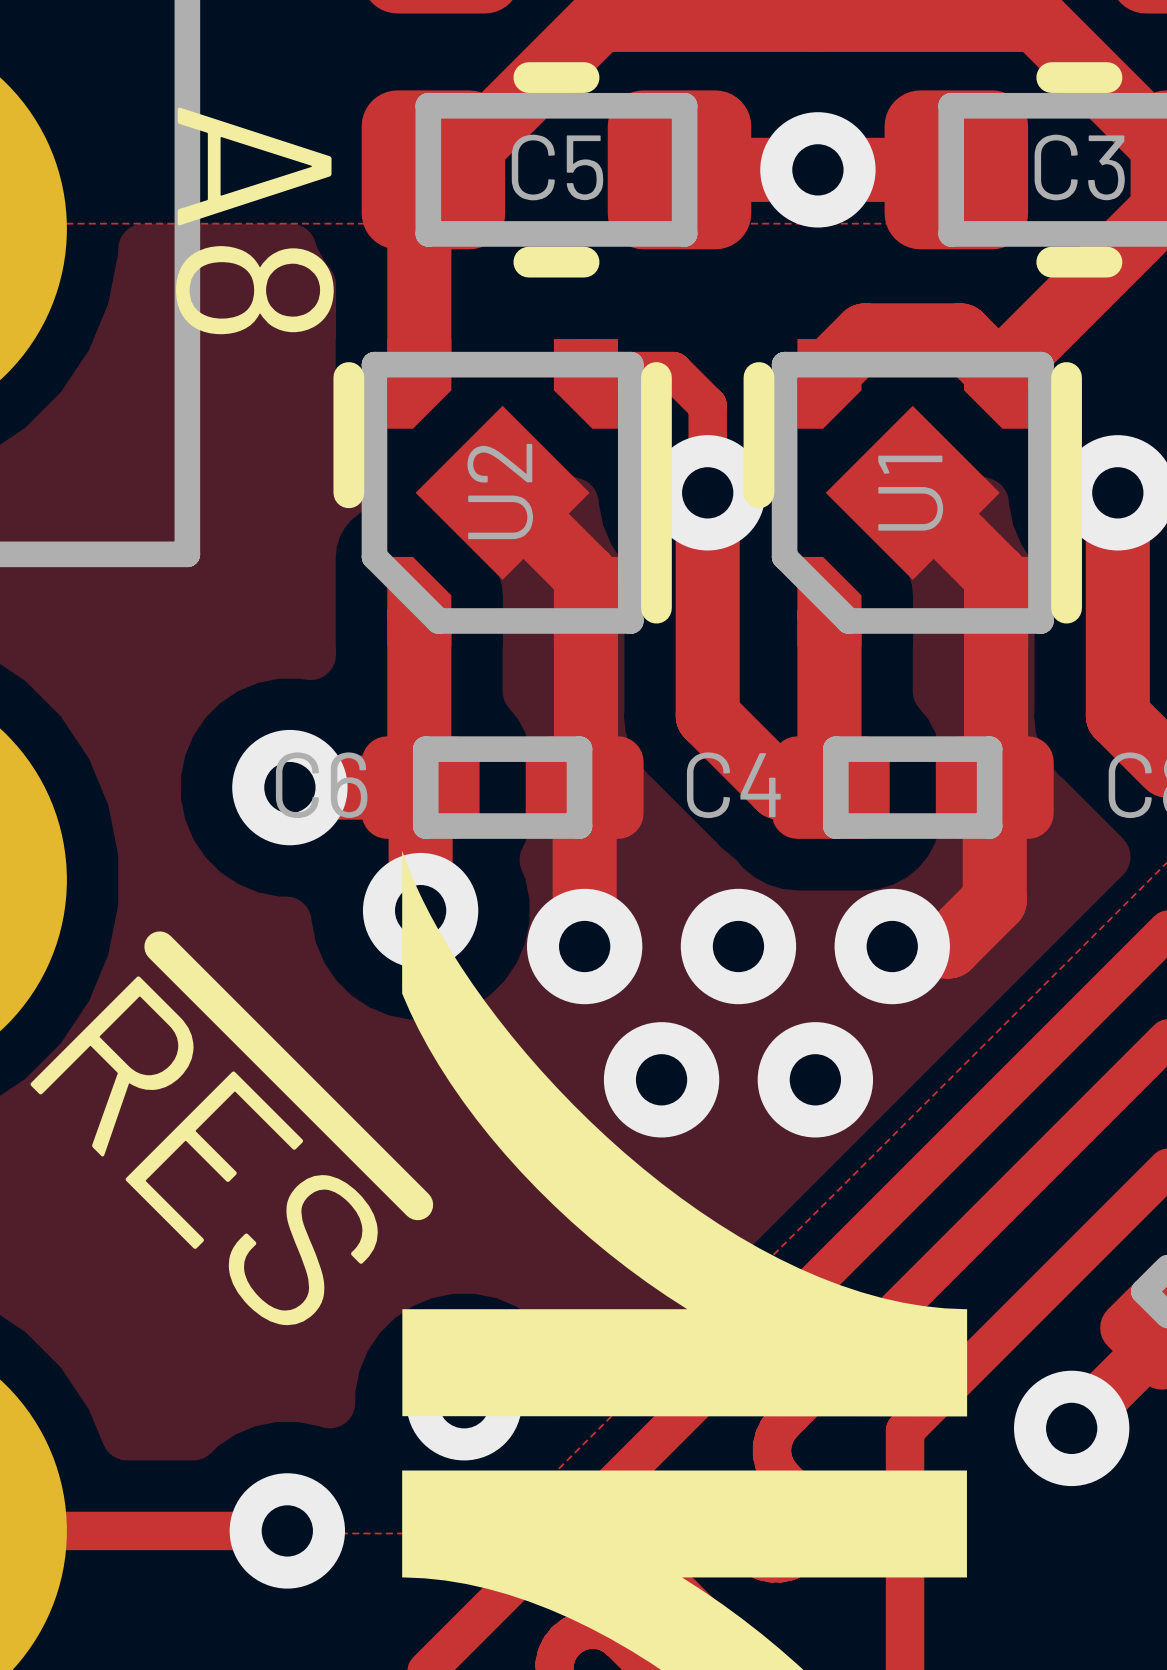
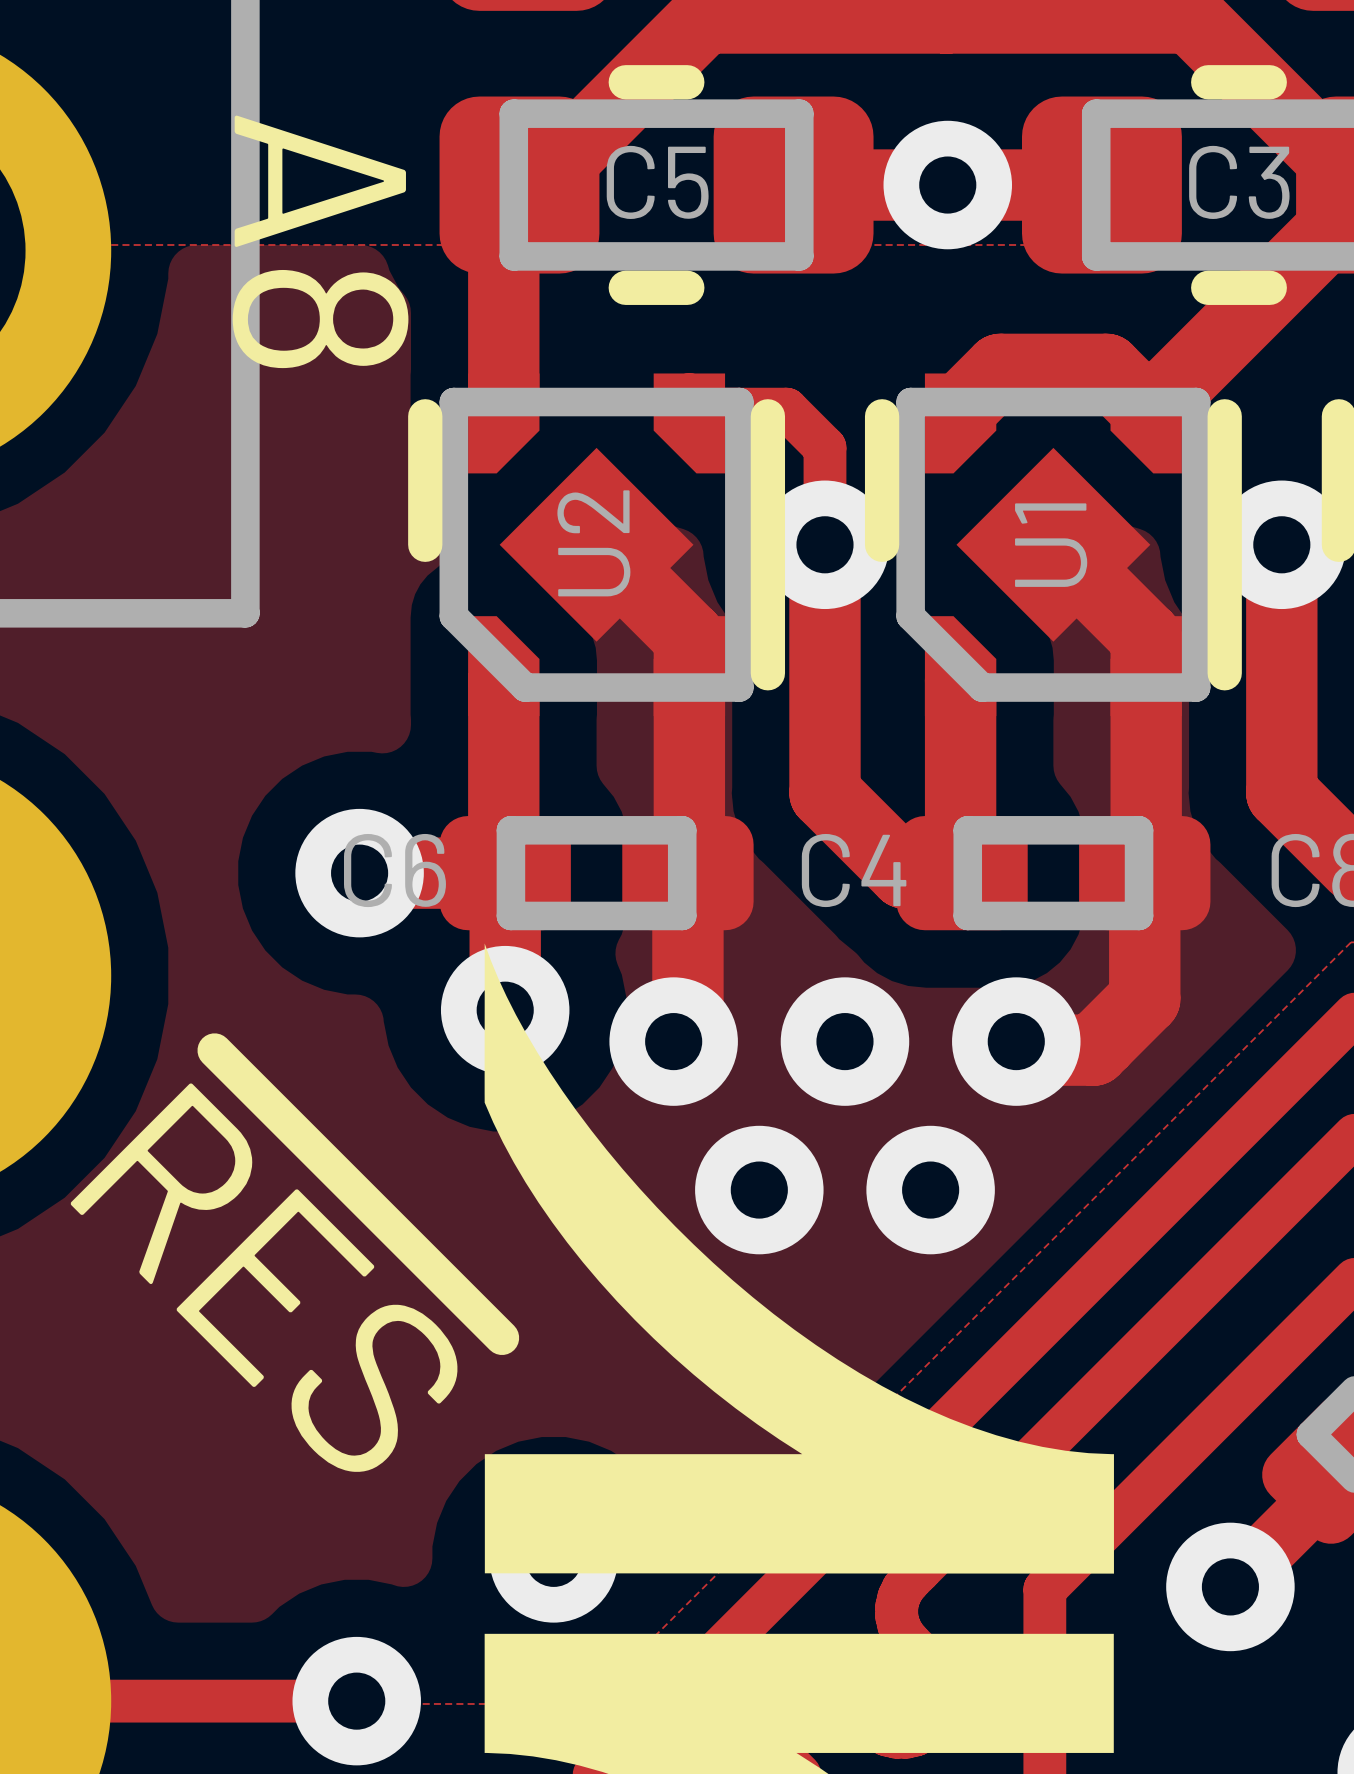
via position: (584, 946) -> (673, 1041)
via position: (738, 946) -> (844, 1041)
via position: (892, 946) -> (1016, 1041)
via position: (661, 1079) -> (759, 1190)
via position: (815, 1079) -> (930, 1190)

